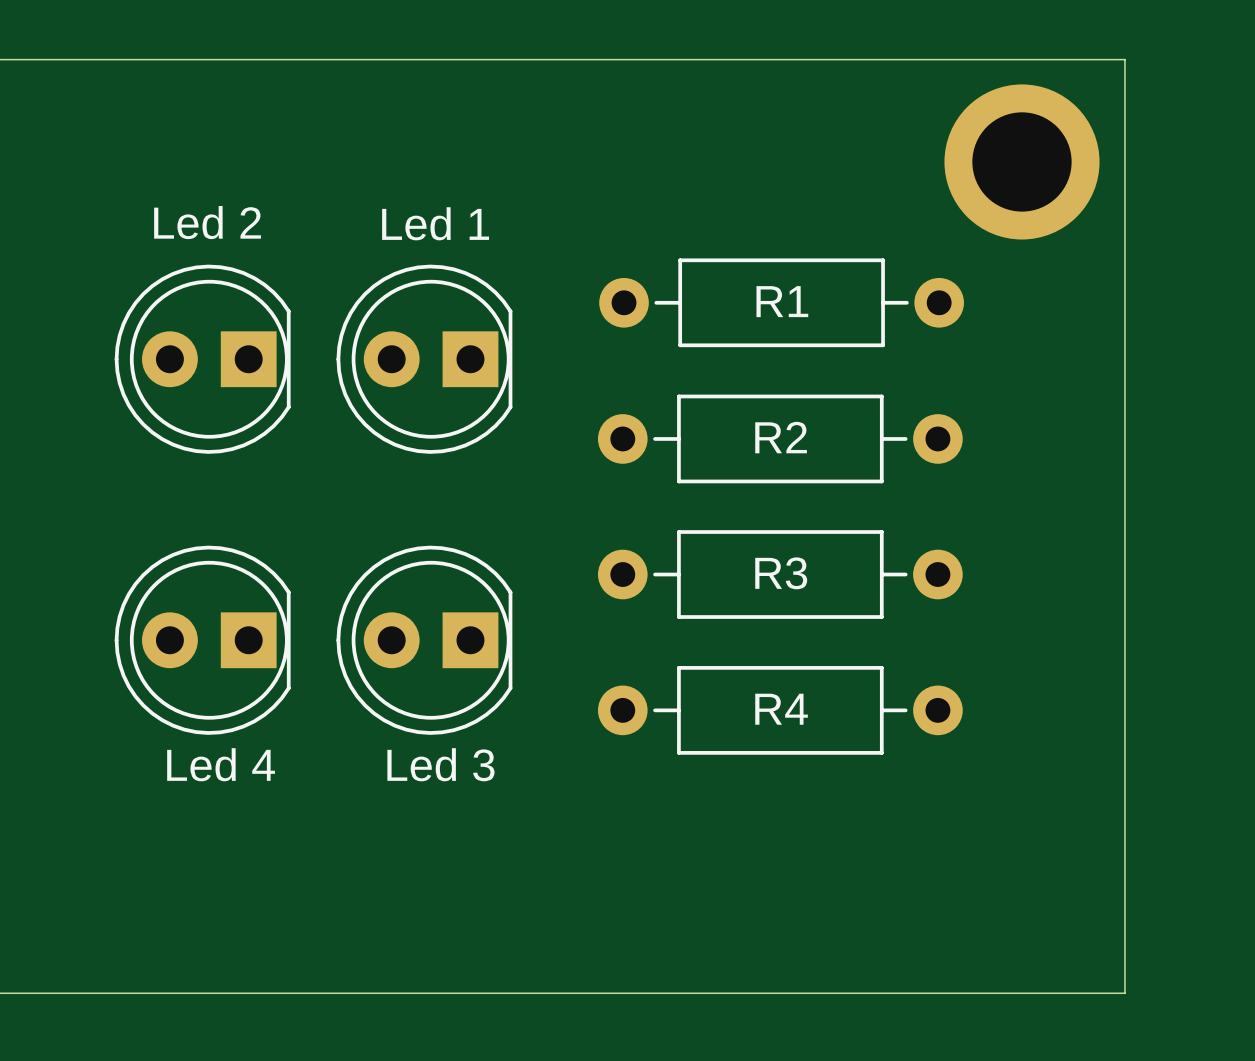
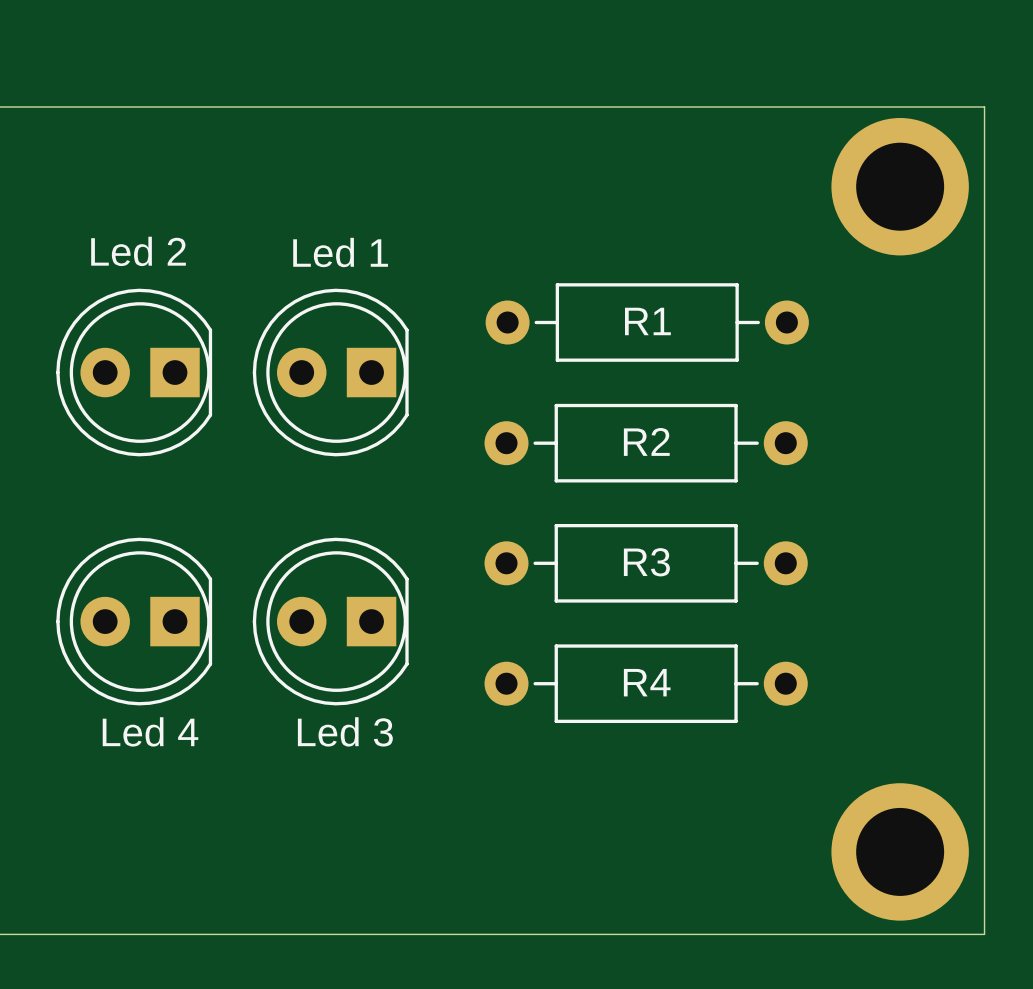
board edge: (1124, 59) (1124, 993) -> (951, 106) (984, 106) (984, 934) (951, 934)
part position: (1021, 161) -> (900, 186)
part: none -> (900, 851)

